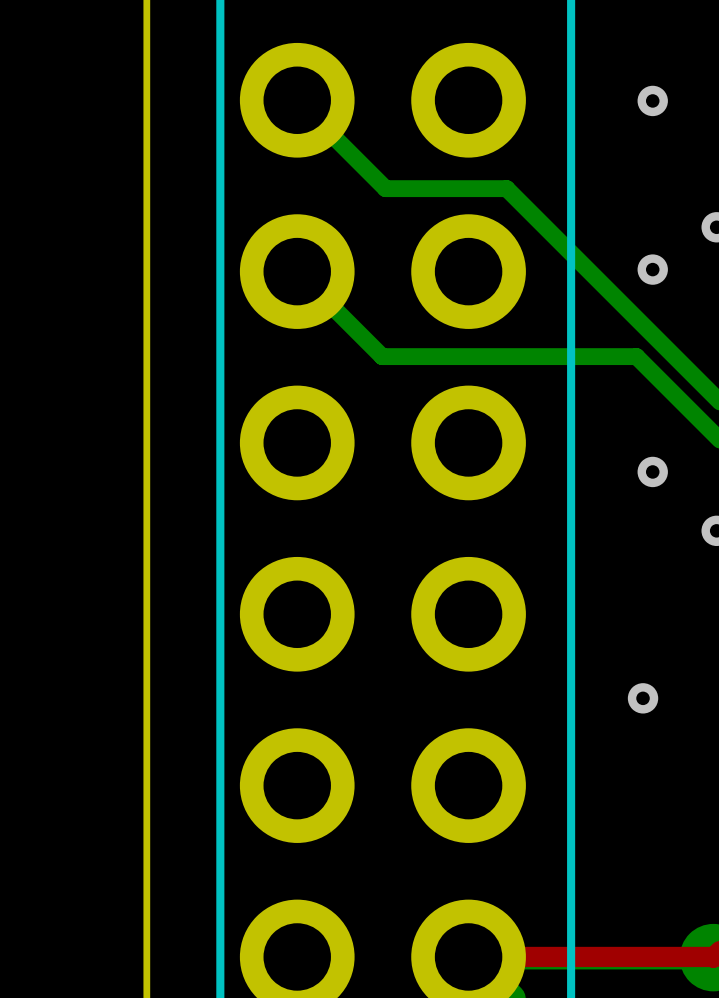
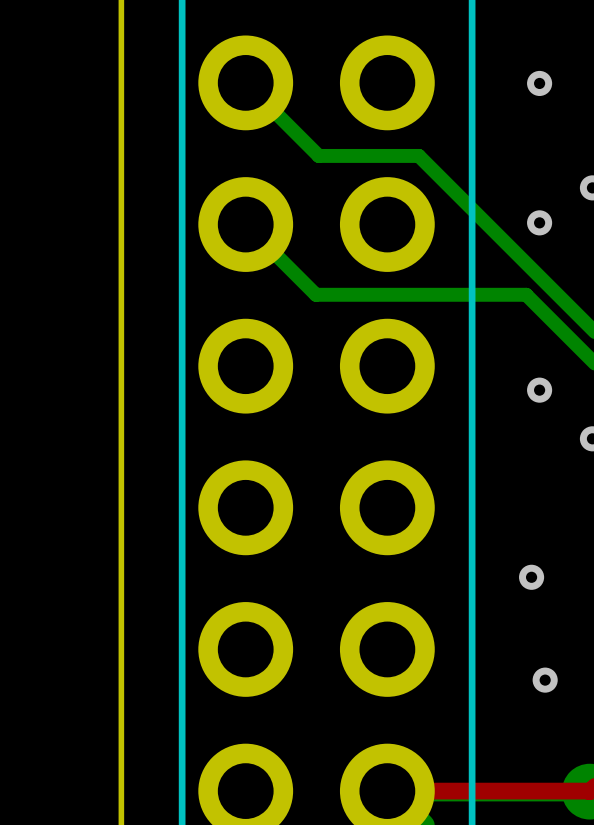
via: none -> (545, 680)

